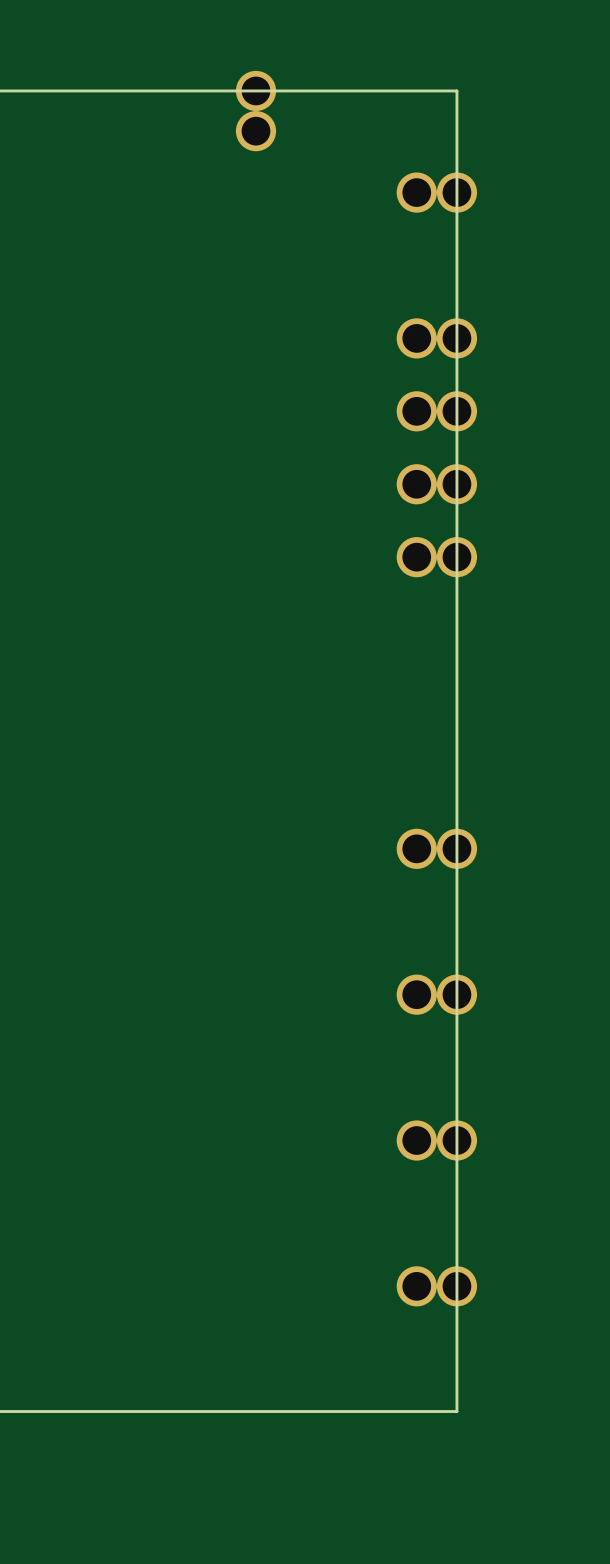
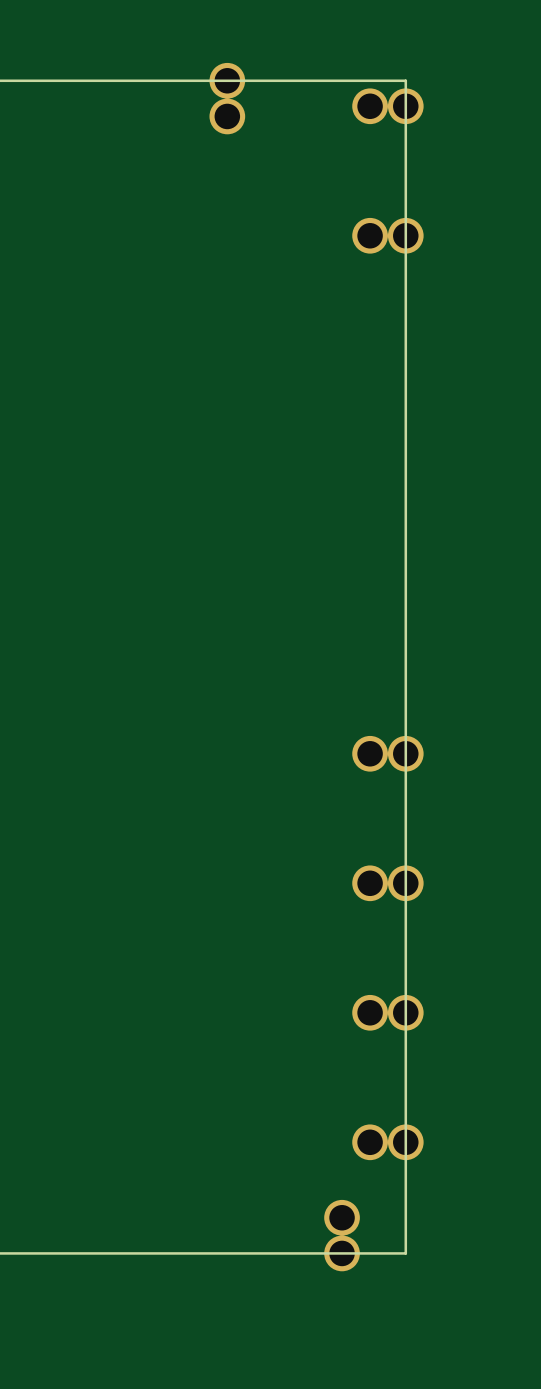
part: none -> (387, 106)
part: (436, 192) -> none
part: none -> (387, 235)
part: (436, 338) -> none
part: (436, 411) -> none
part: (436, 484) -> none
part: (436, 557) -> none
part: none -> (342, 1235)

